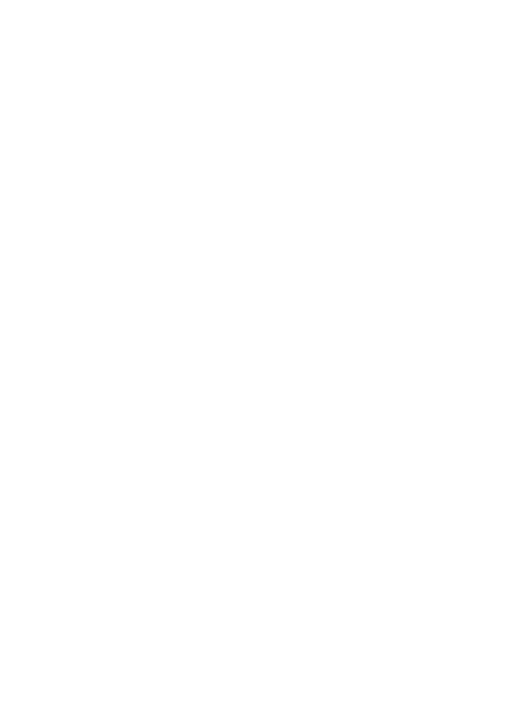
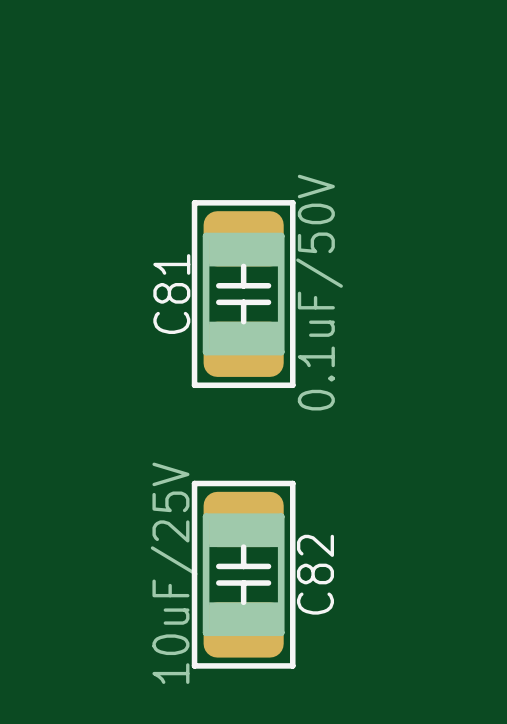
C81: none -> 0.1uF/50V (243, 294)
C82: none -> 10uF/25V (243, 574)

